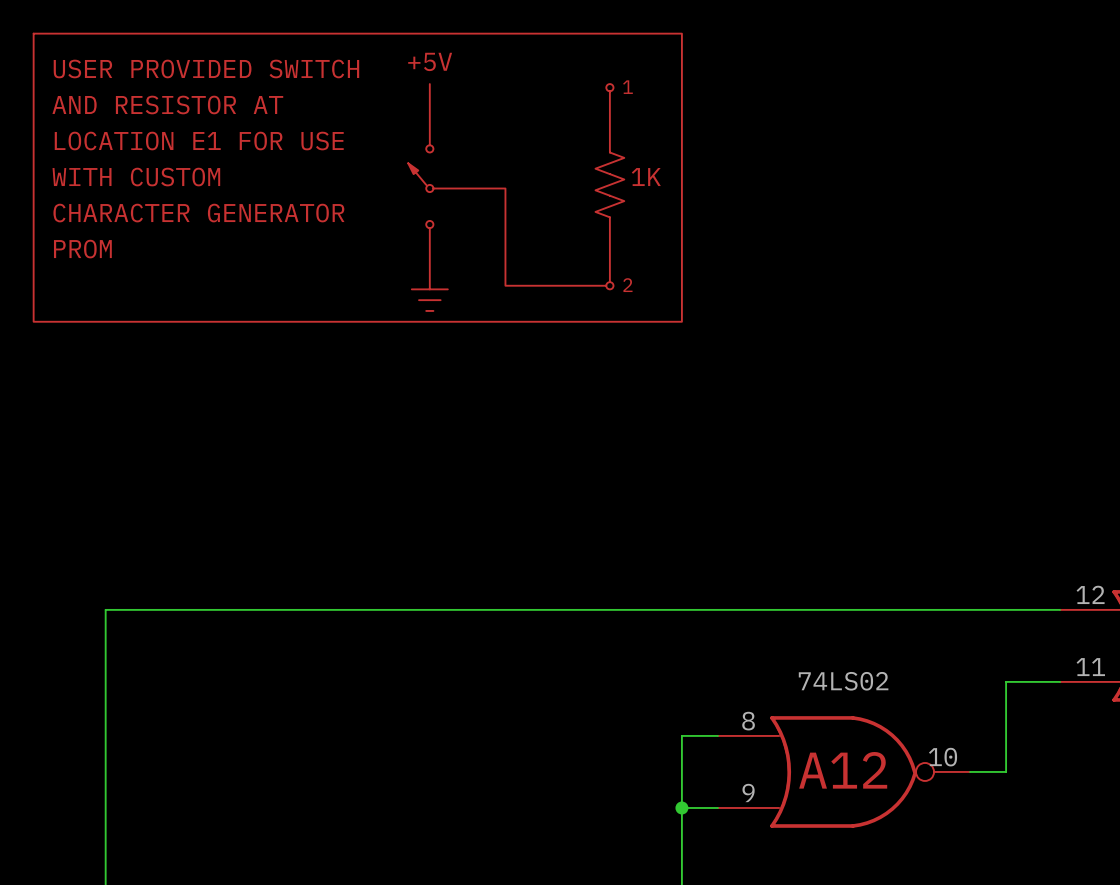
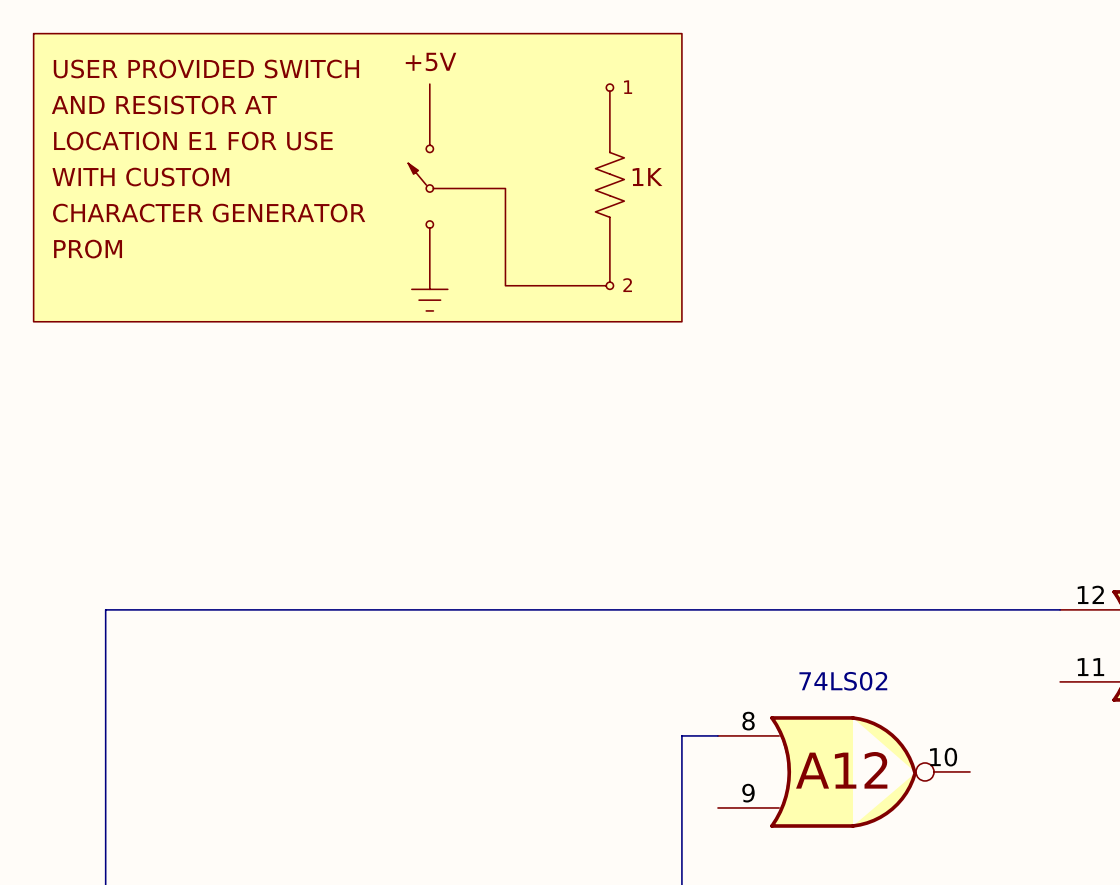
wire: (1060, 681) (1006, 681) (1006, 771) (970, 771) -> none
wire: (681, 807) (717, 807) -> none
junction: (681, 807) -> none

